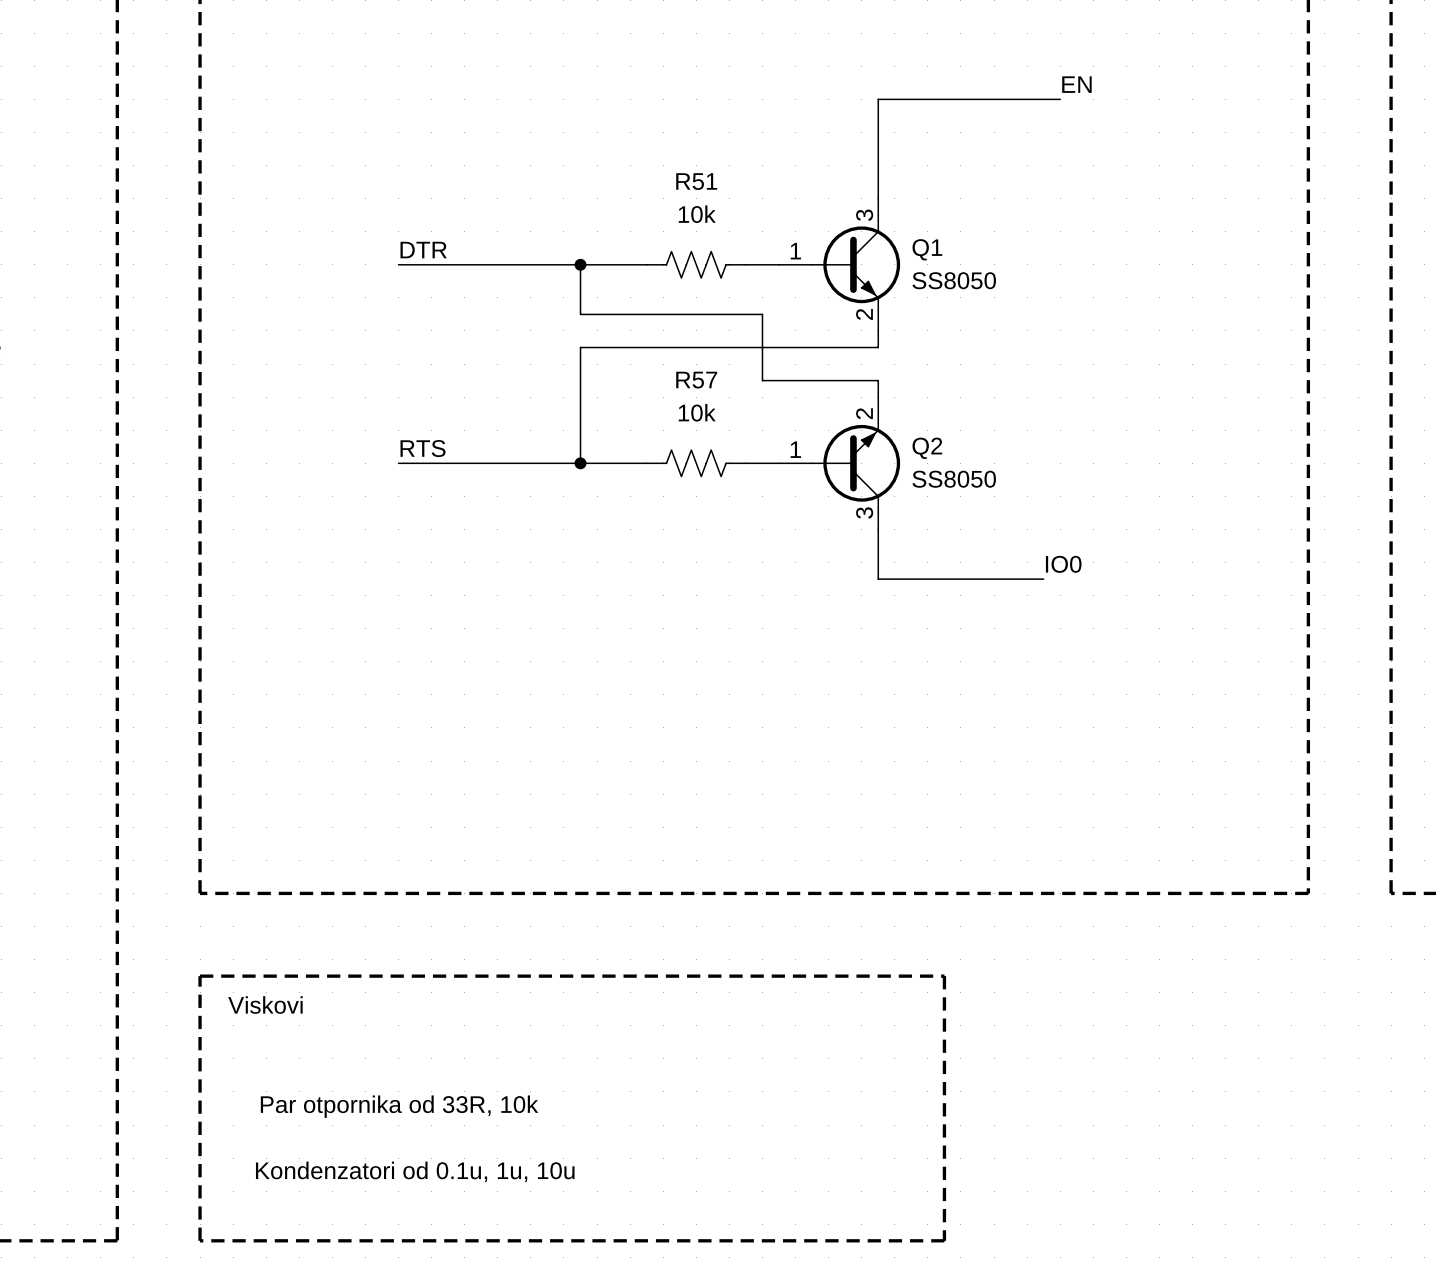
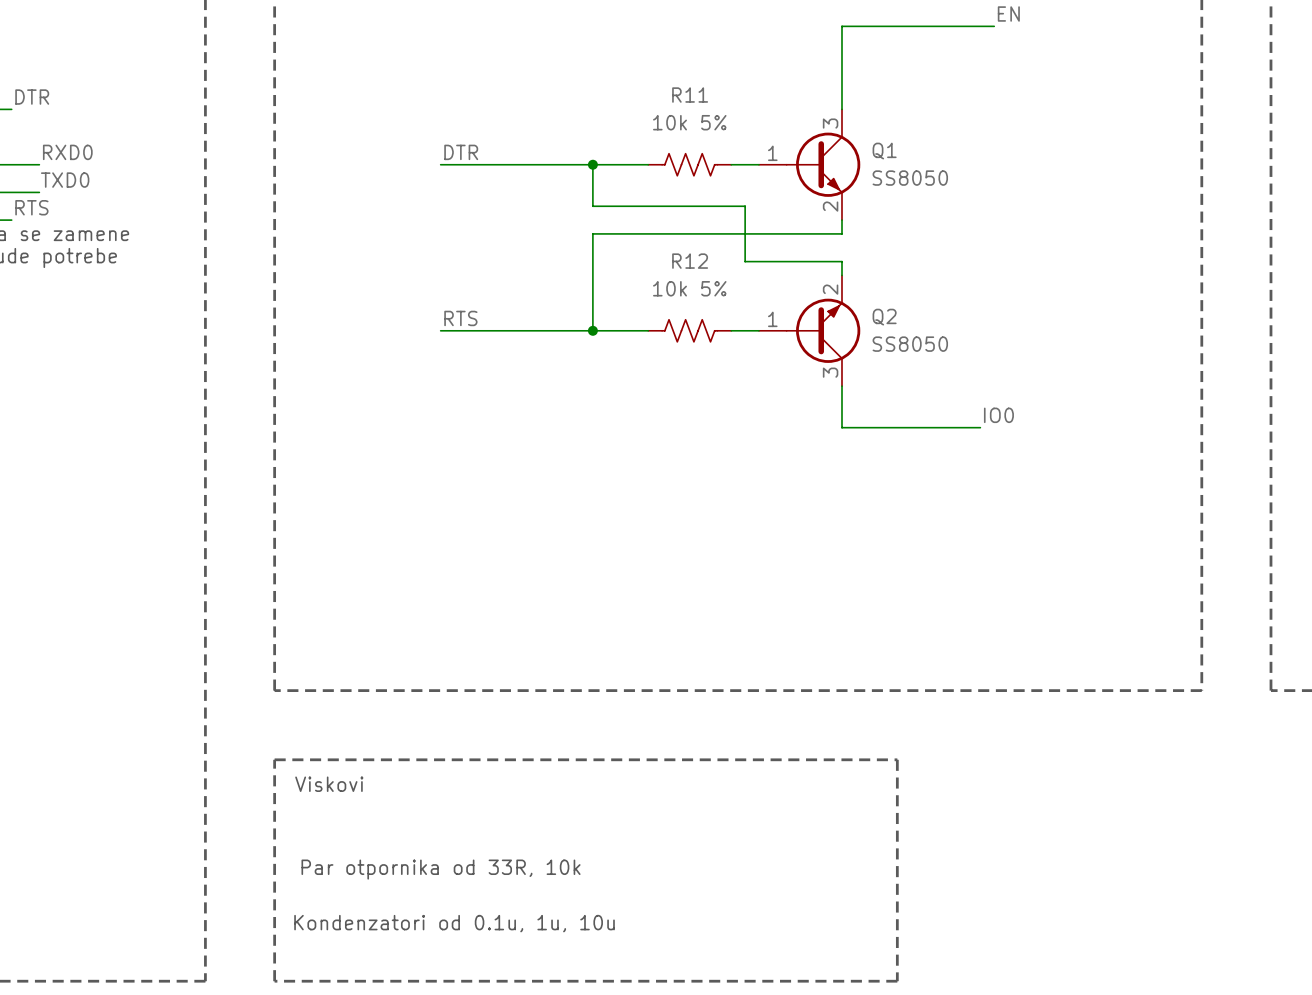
R51 name: R51 (696, 181) -> R11 (690, 95)
R51 value: 10k (697, 214) -> 10k 5% (689, 122)
R57 name: R57 (696, 380) -> R12 (690, 261)
R57 value: 10k (697, 412) -> 10k 5% (689, 288)

